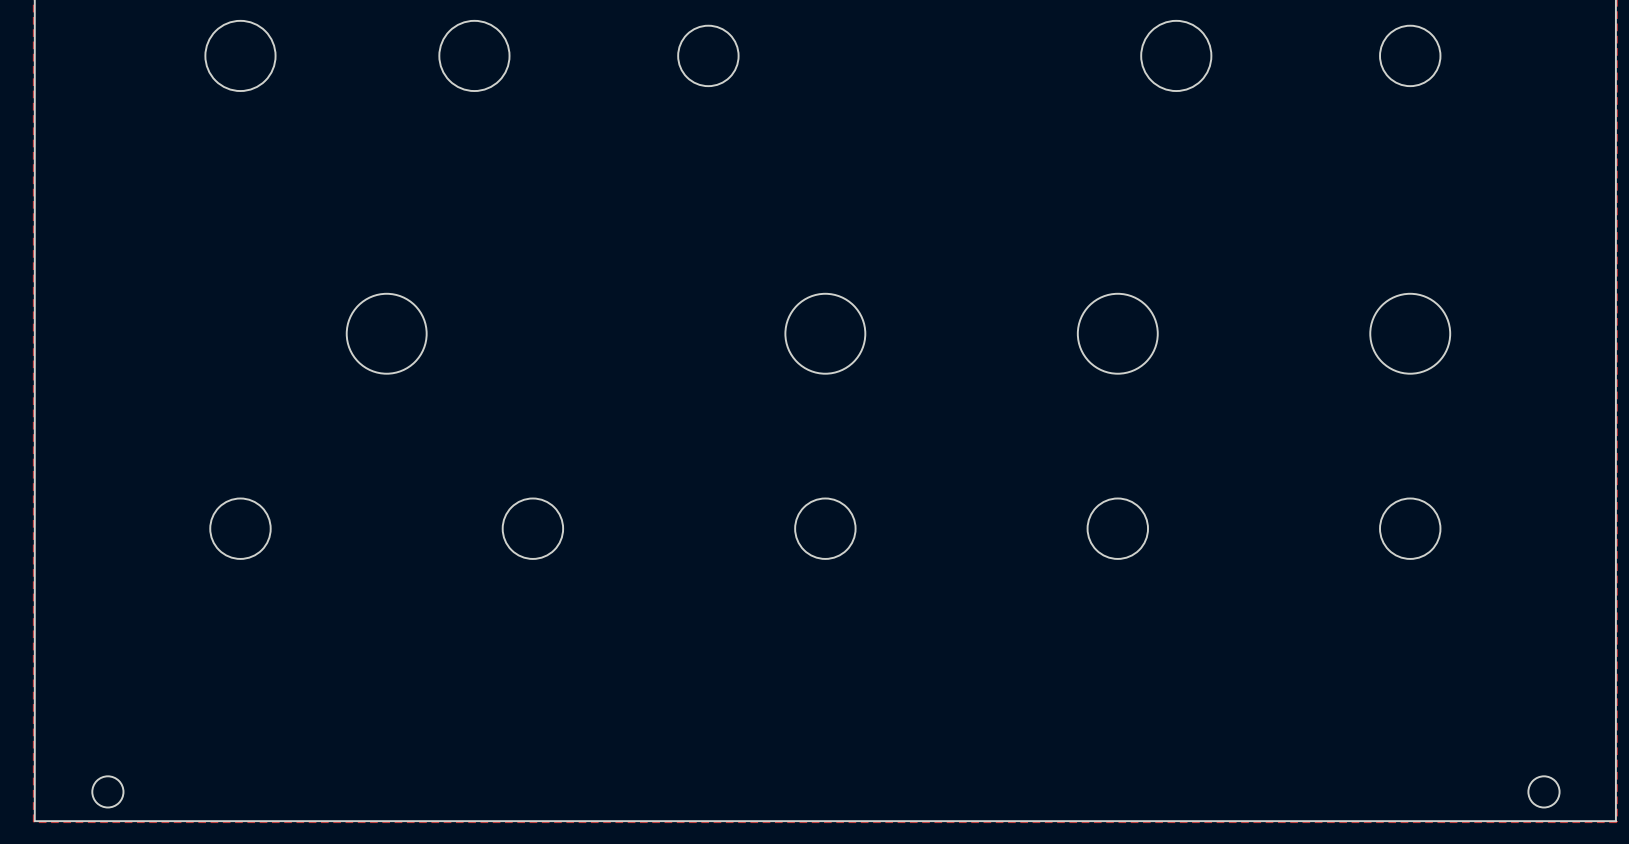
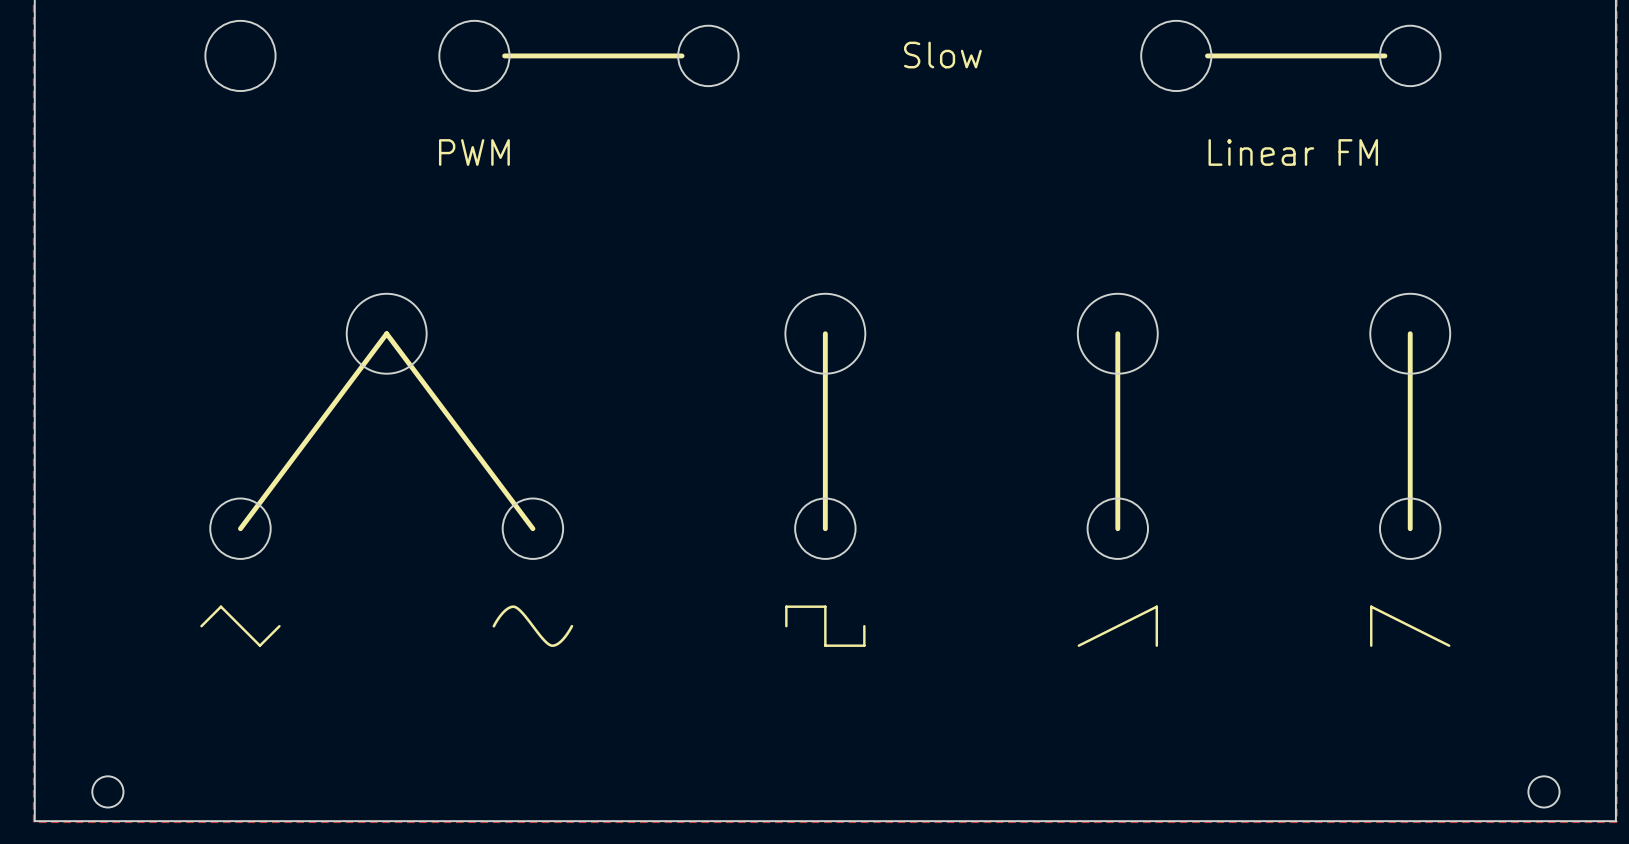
line: none -> (504, 55) (682, 55)
text: none -> Slow (942, 55)
line: none -> (1207, 55) (1384, 55)
text: none -> PWM (474, 152)
text: none -> Linear FM (1293, 152)
line: none -> (825, 333) (825, 528)
line: none -> (1117, 333) (1117, 528)
line: none -> (1410, 333) (1410, 528)
line: none -> (240, 528) (386, 333) (532, 528)
drawing: none -> [492, 605, 574, 647]
line: none -> (201, 626) (220, 606) (259, 645) (279, 626)
line: none -> (786, 626) (786, 606) (825, 606) (825, 645) (864, 645) (864, 626)
line: none -> (1078, 645) (1156, 606) (1156, 645)
line: none -> (1371, 645) (1371, 606) (1449, 645)

